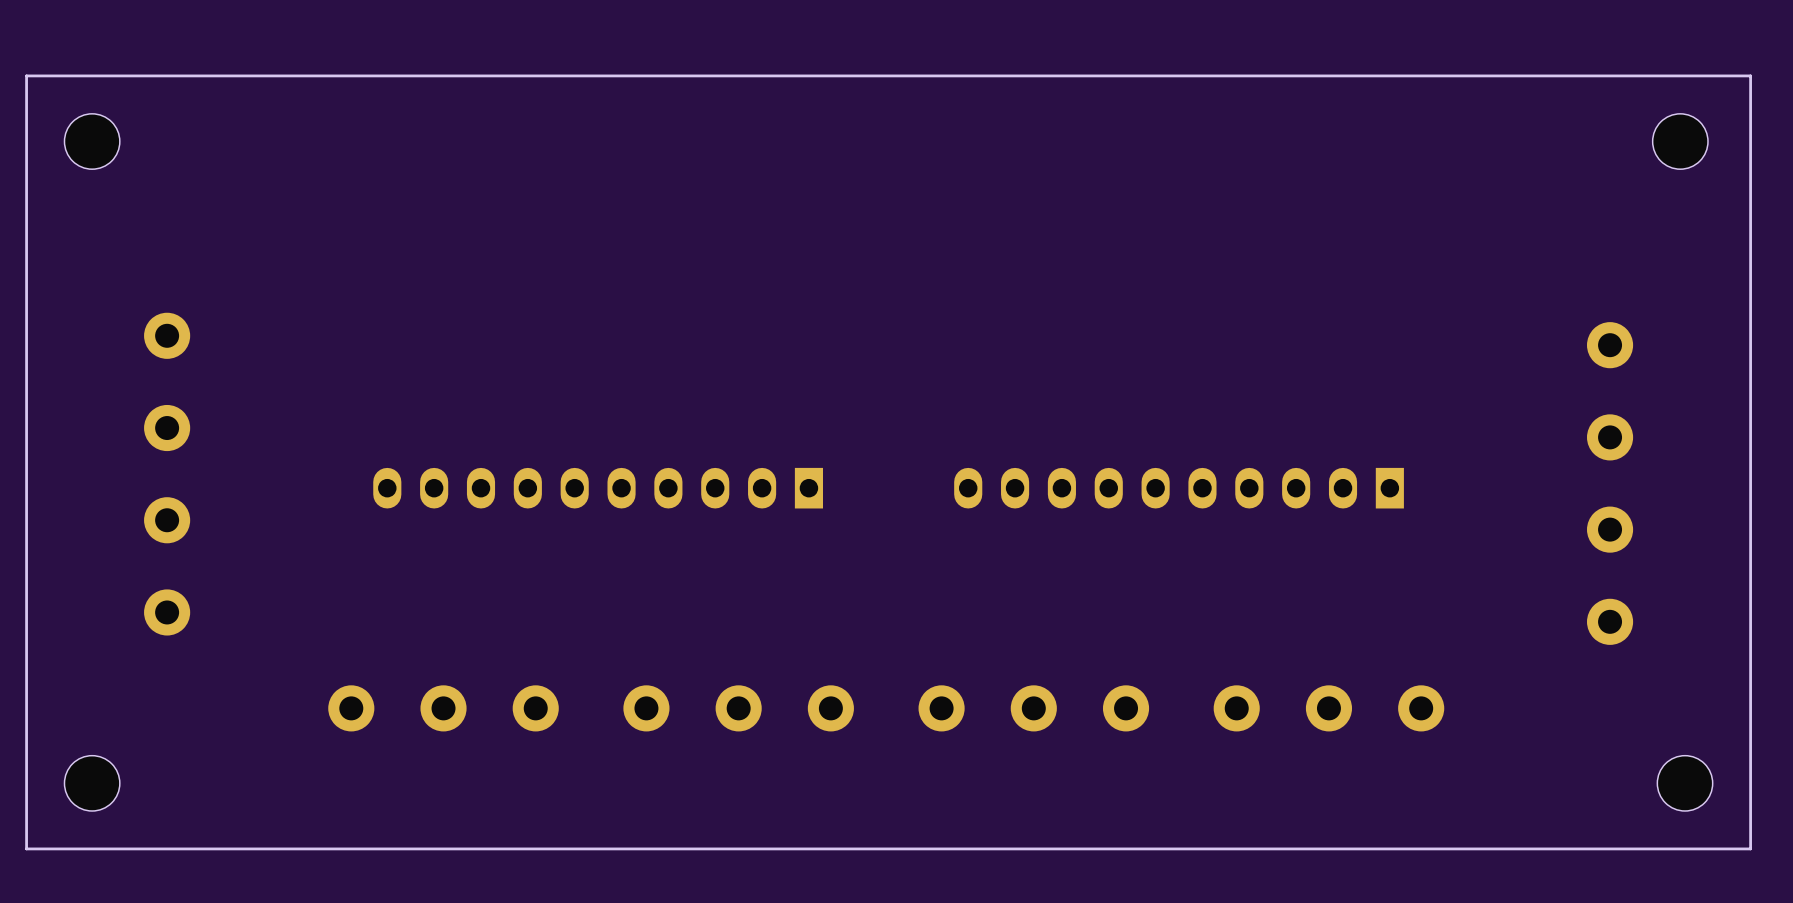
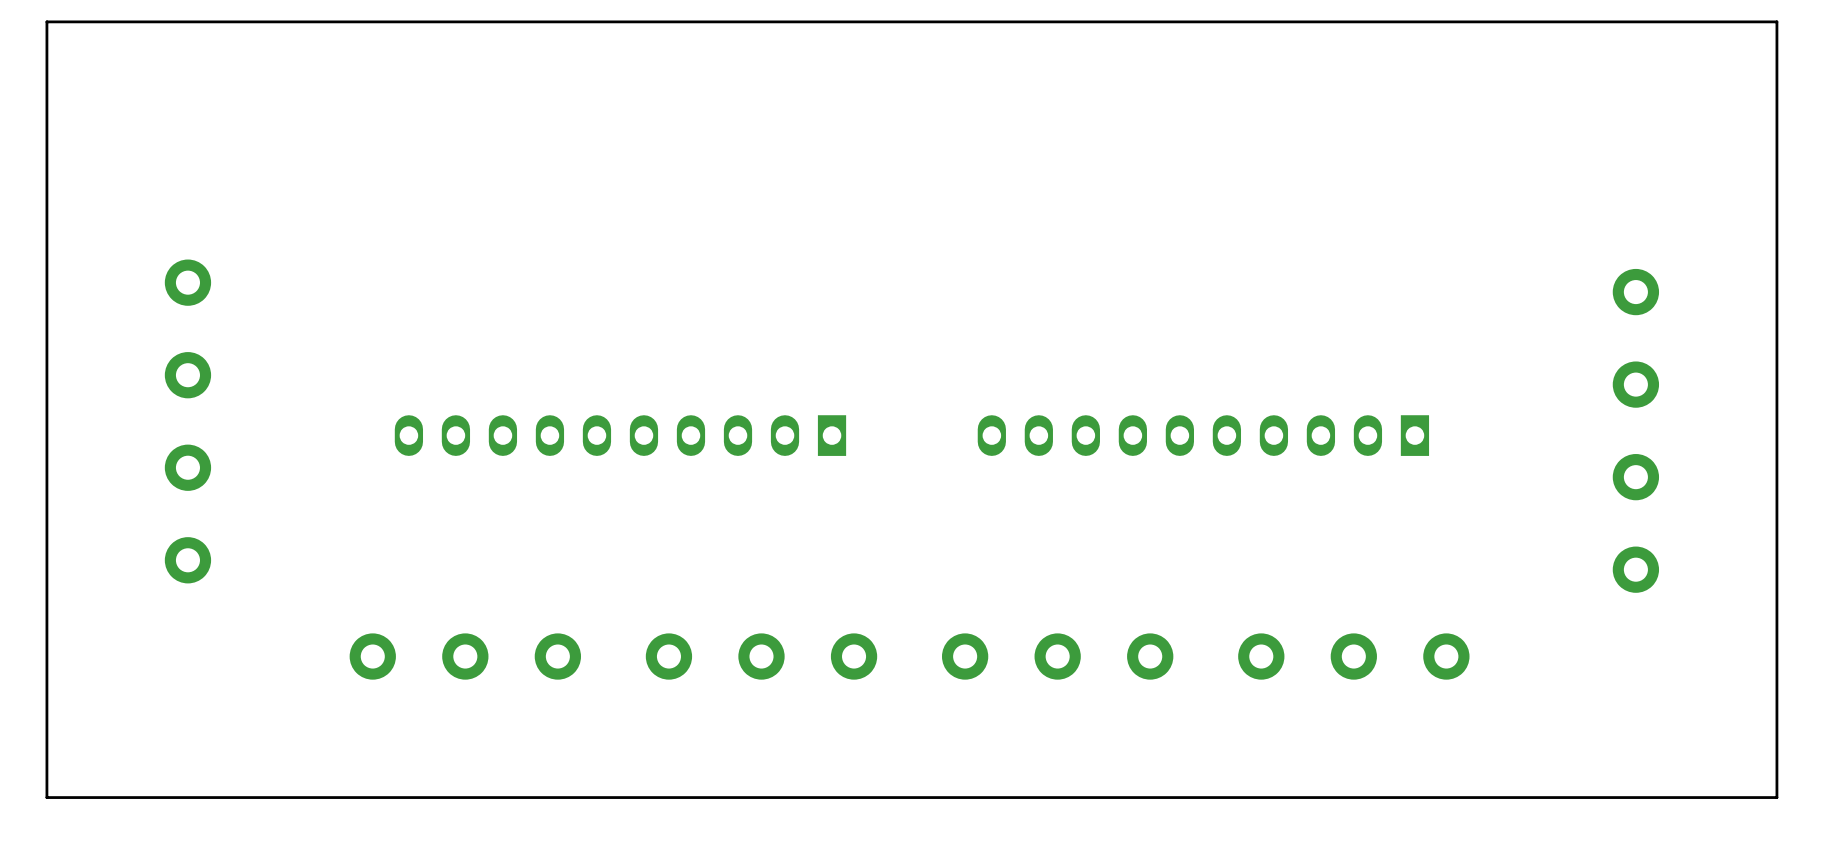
part: (92, 141) -> none
part: (1680, 141) -> none
part: (92, 783) -> none
part: (1685, 783) -> none

